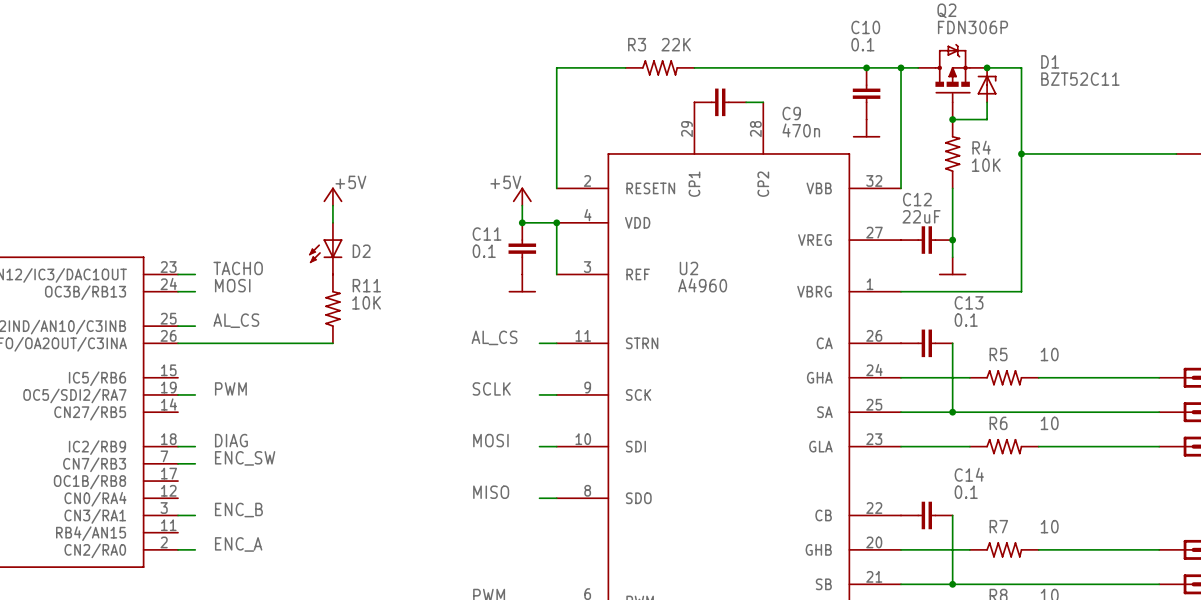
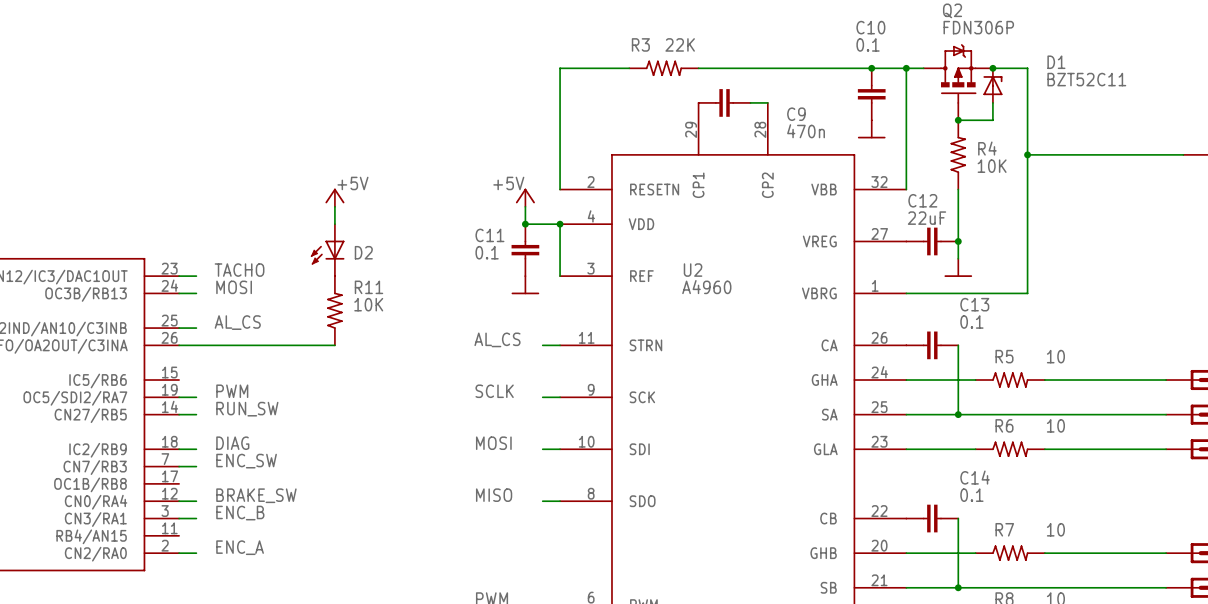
label: none -> RUN_SW (247, 409)
wire: none -> (179, 414) (196, 414)
label: none -> BRAKE_SW (256, 495)
wire: none -> (179, 501) (196, 501)

